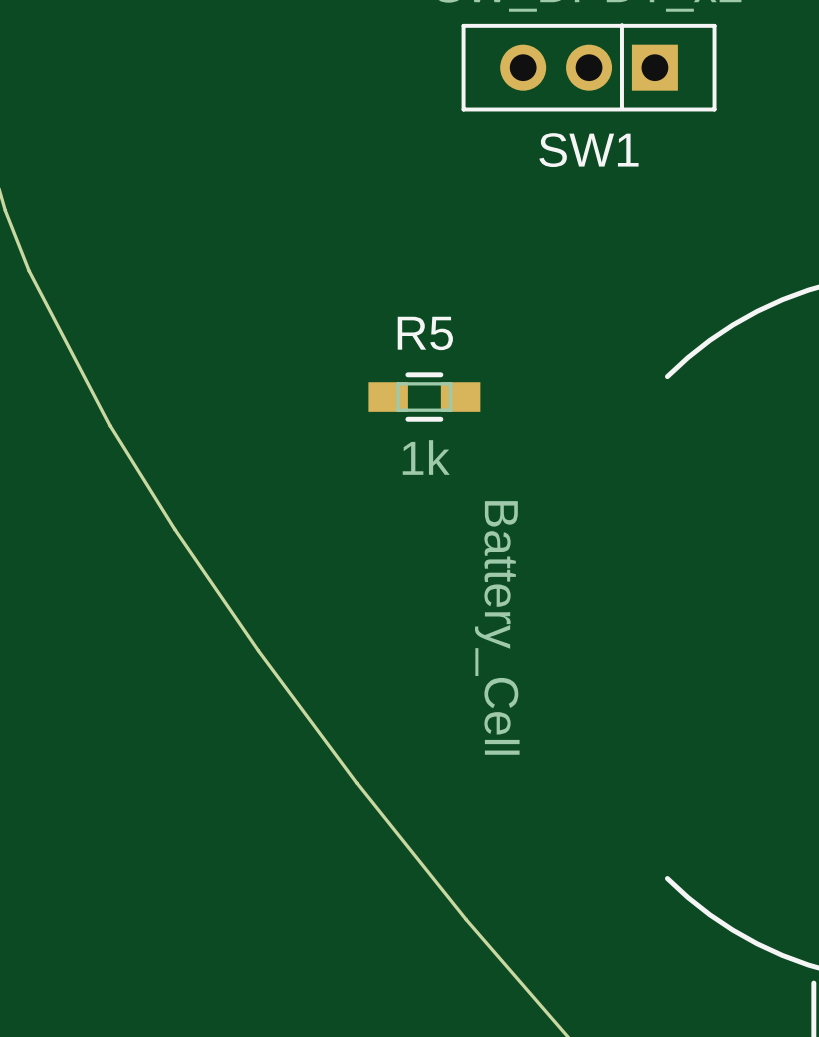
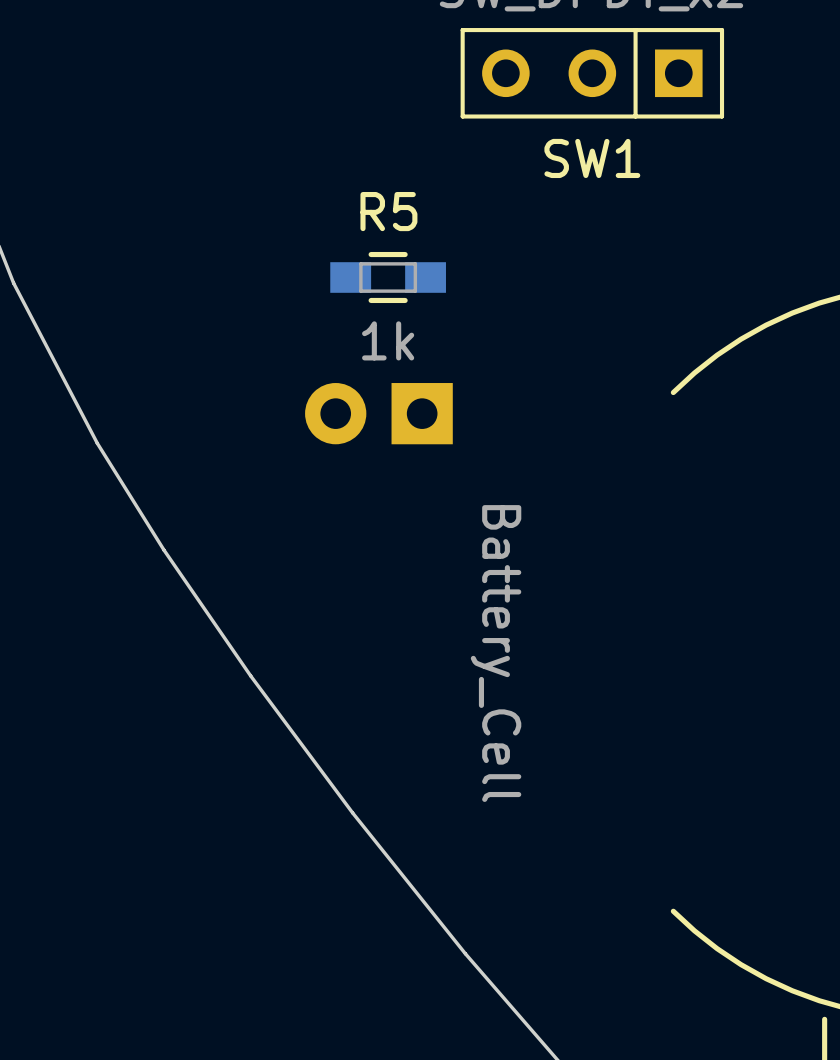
SW1 footprint: [461, 23, 717, 112] -> [460, 28, 725, 119]
part: none -> (378, 413)
R5 position: (424, 397) -> (388, 277)

